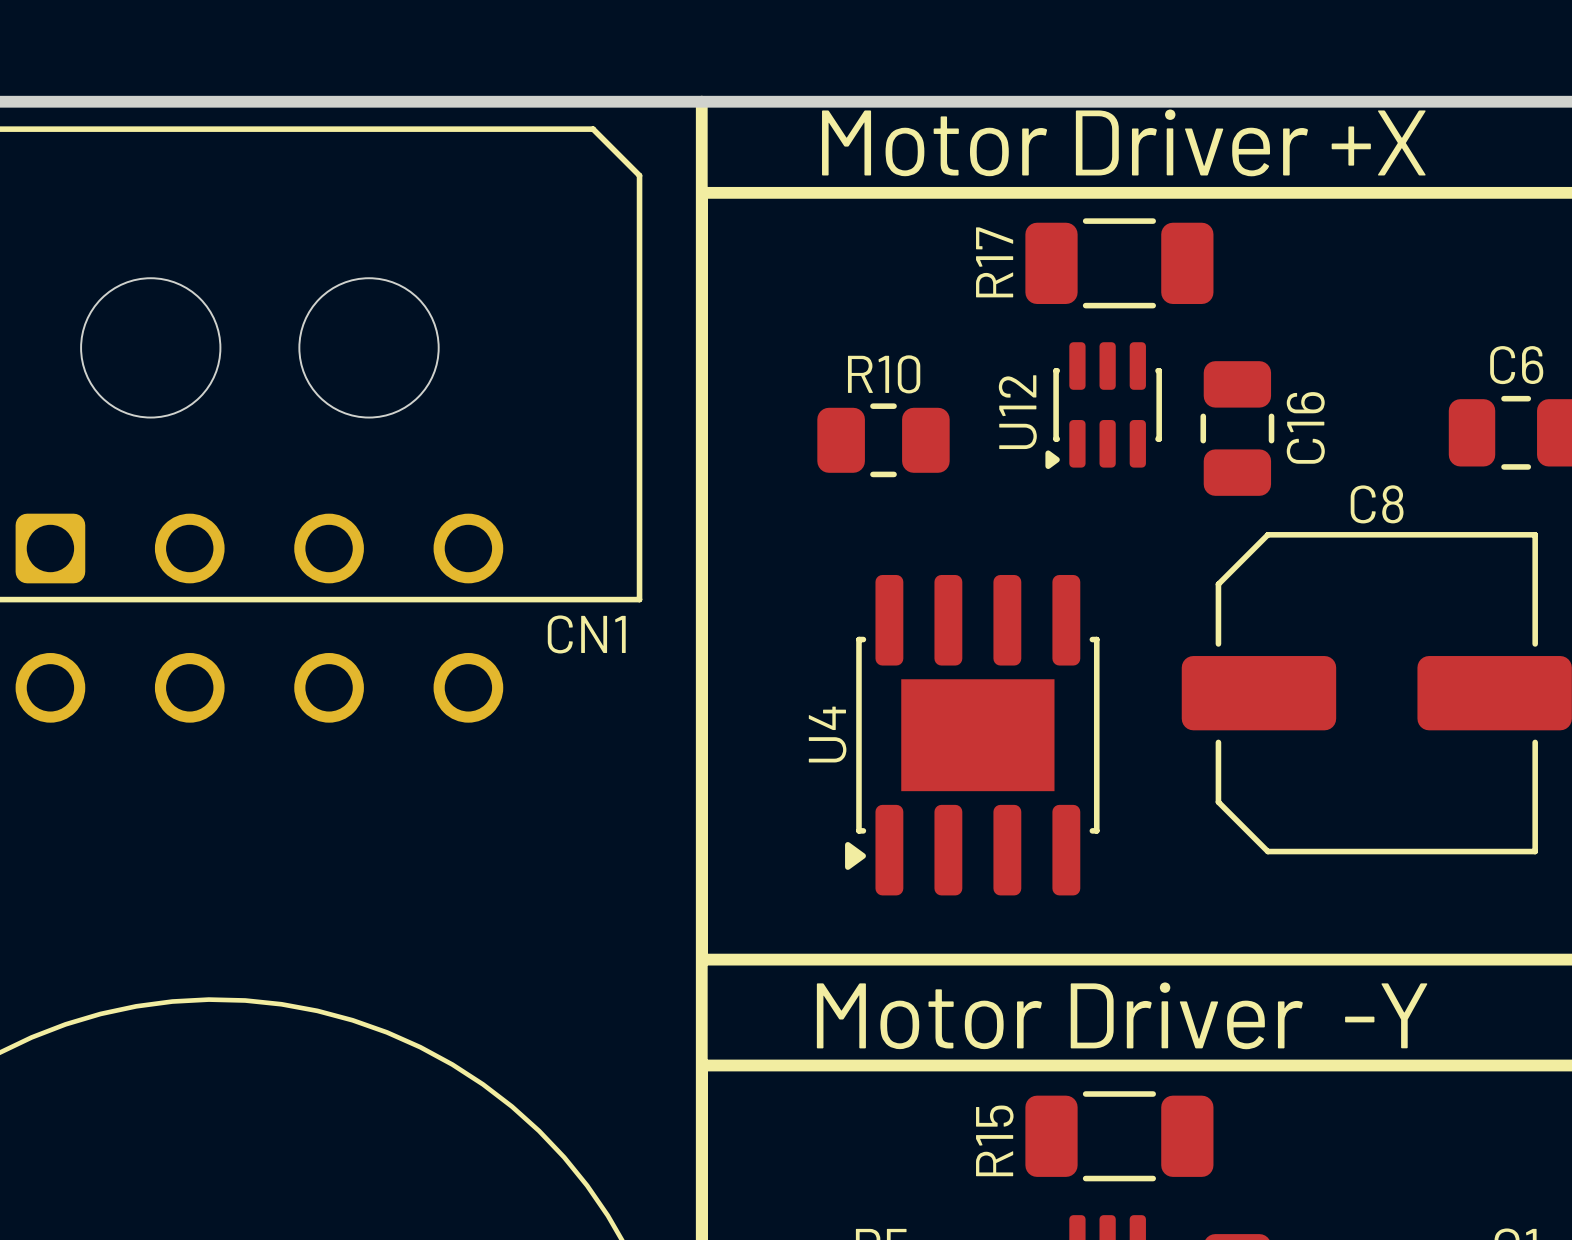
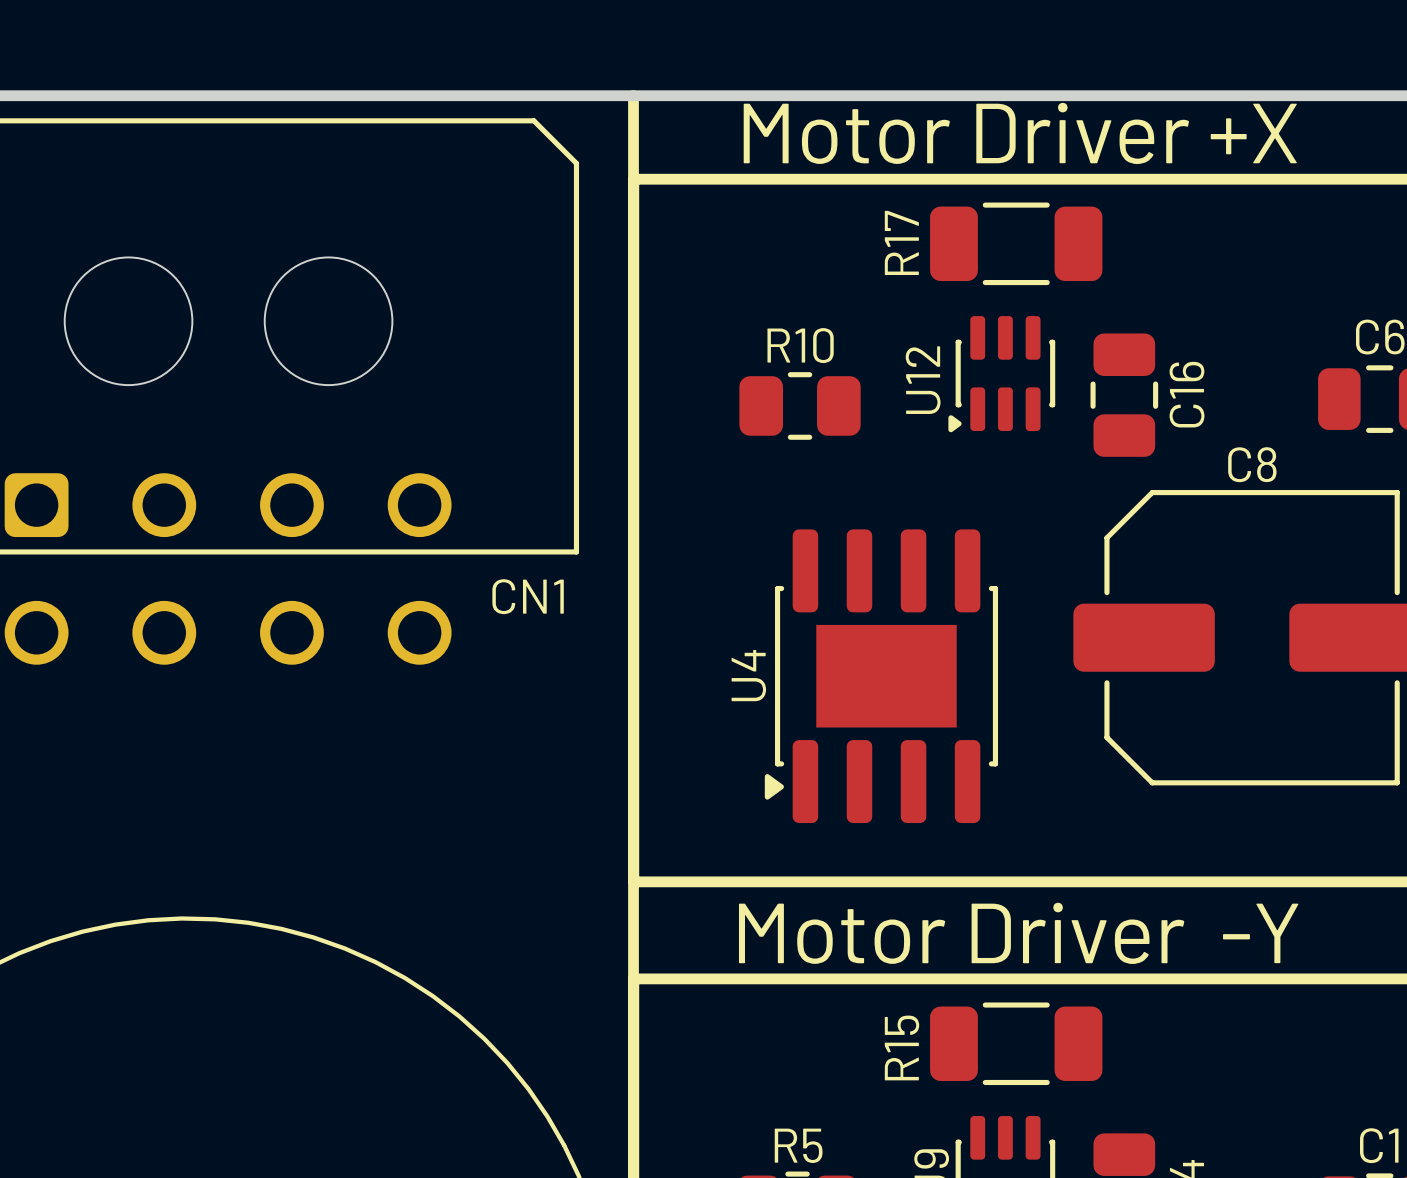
CN1 name position: CN1 (586, 634) -> CN1 (528, 596)

